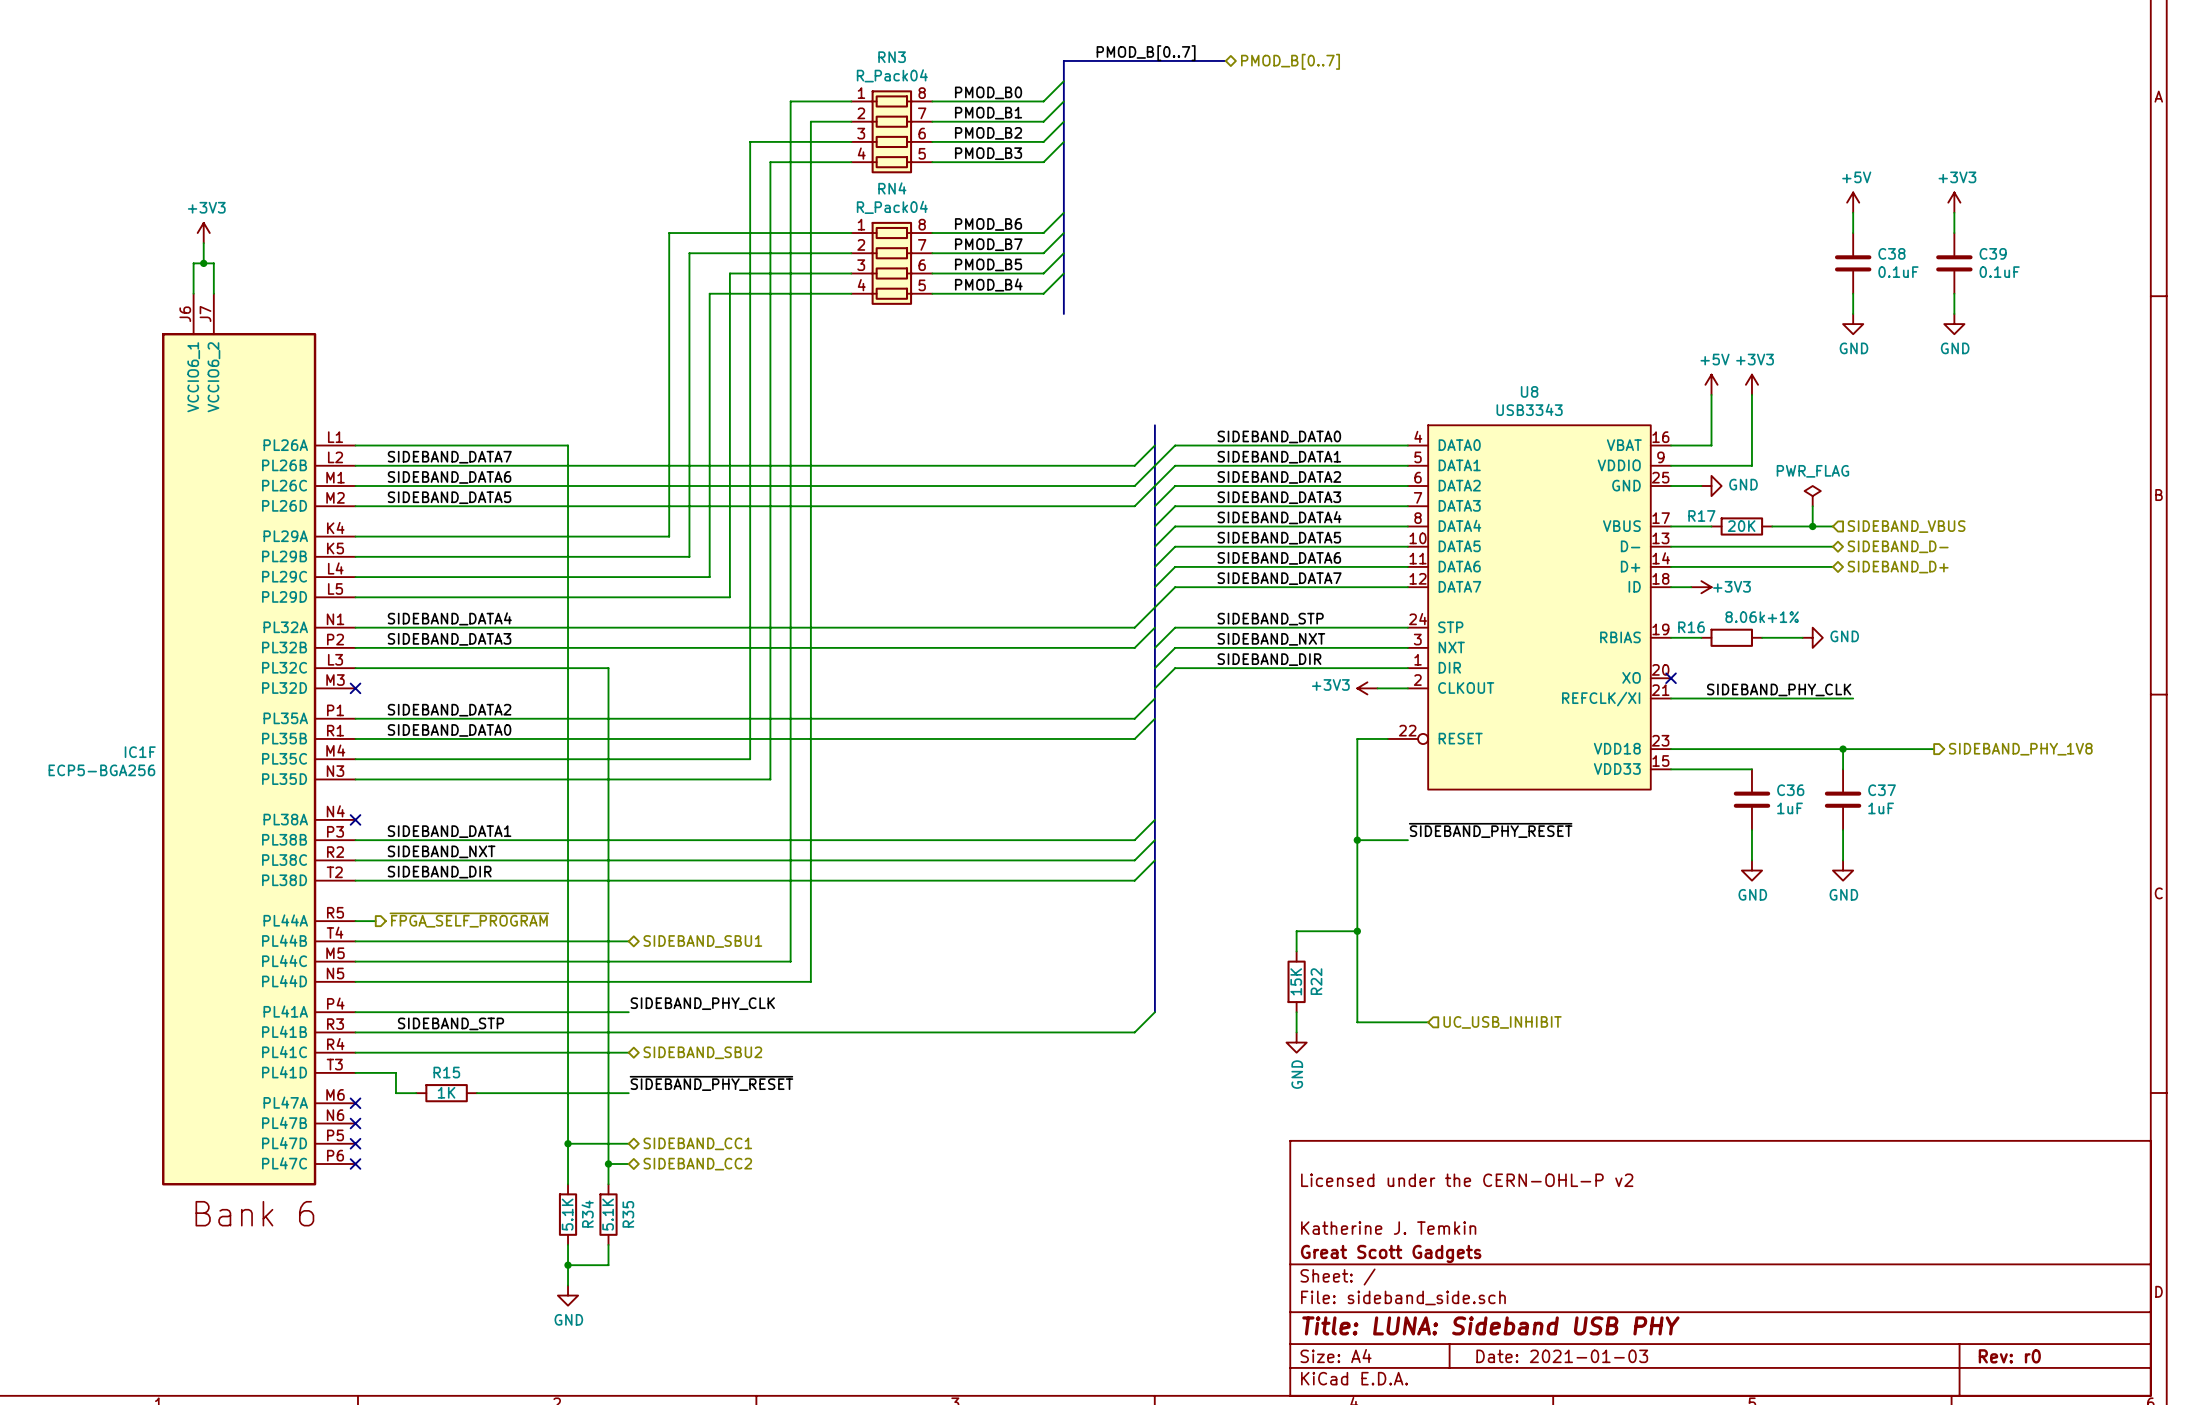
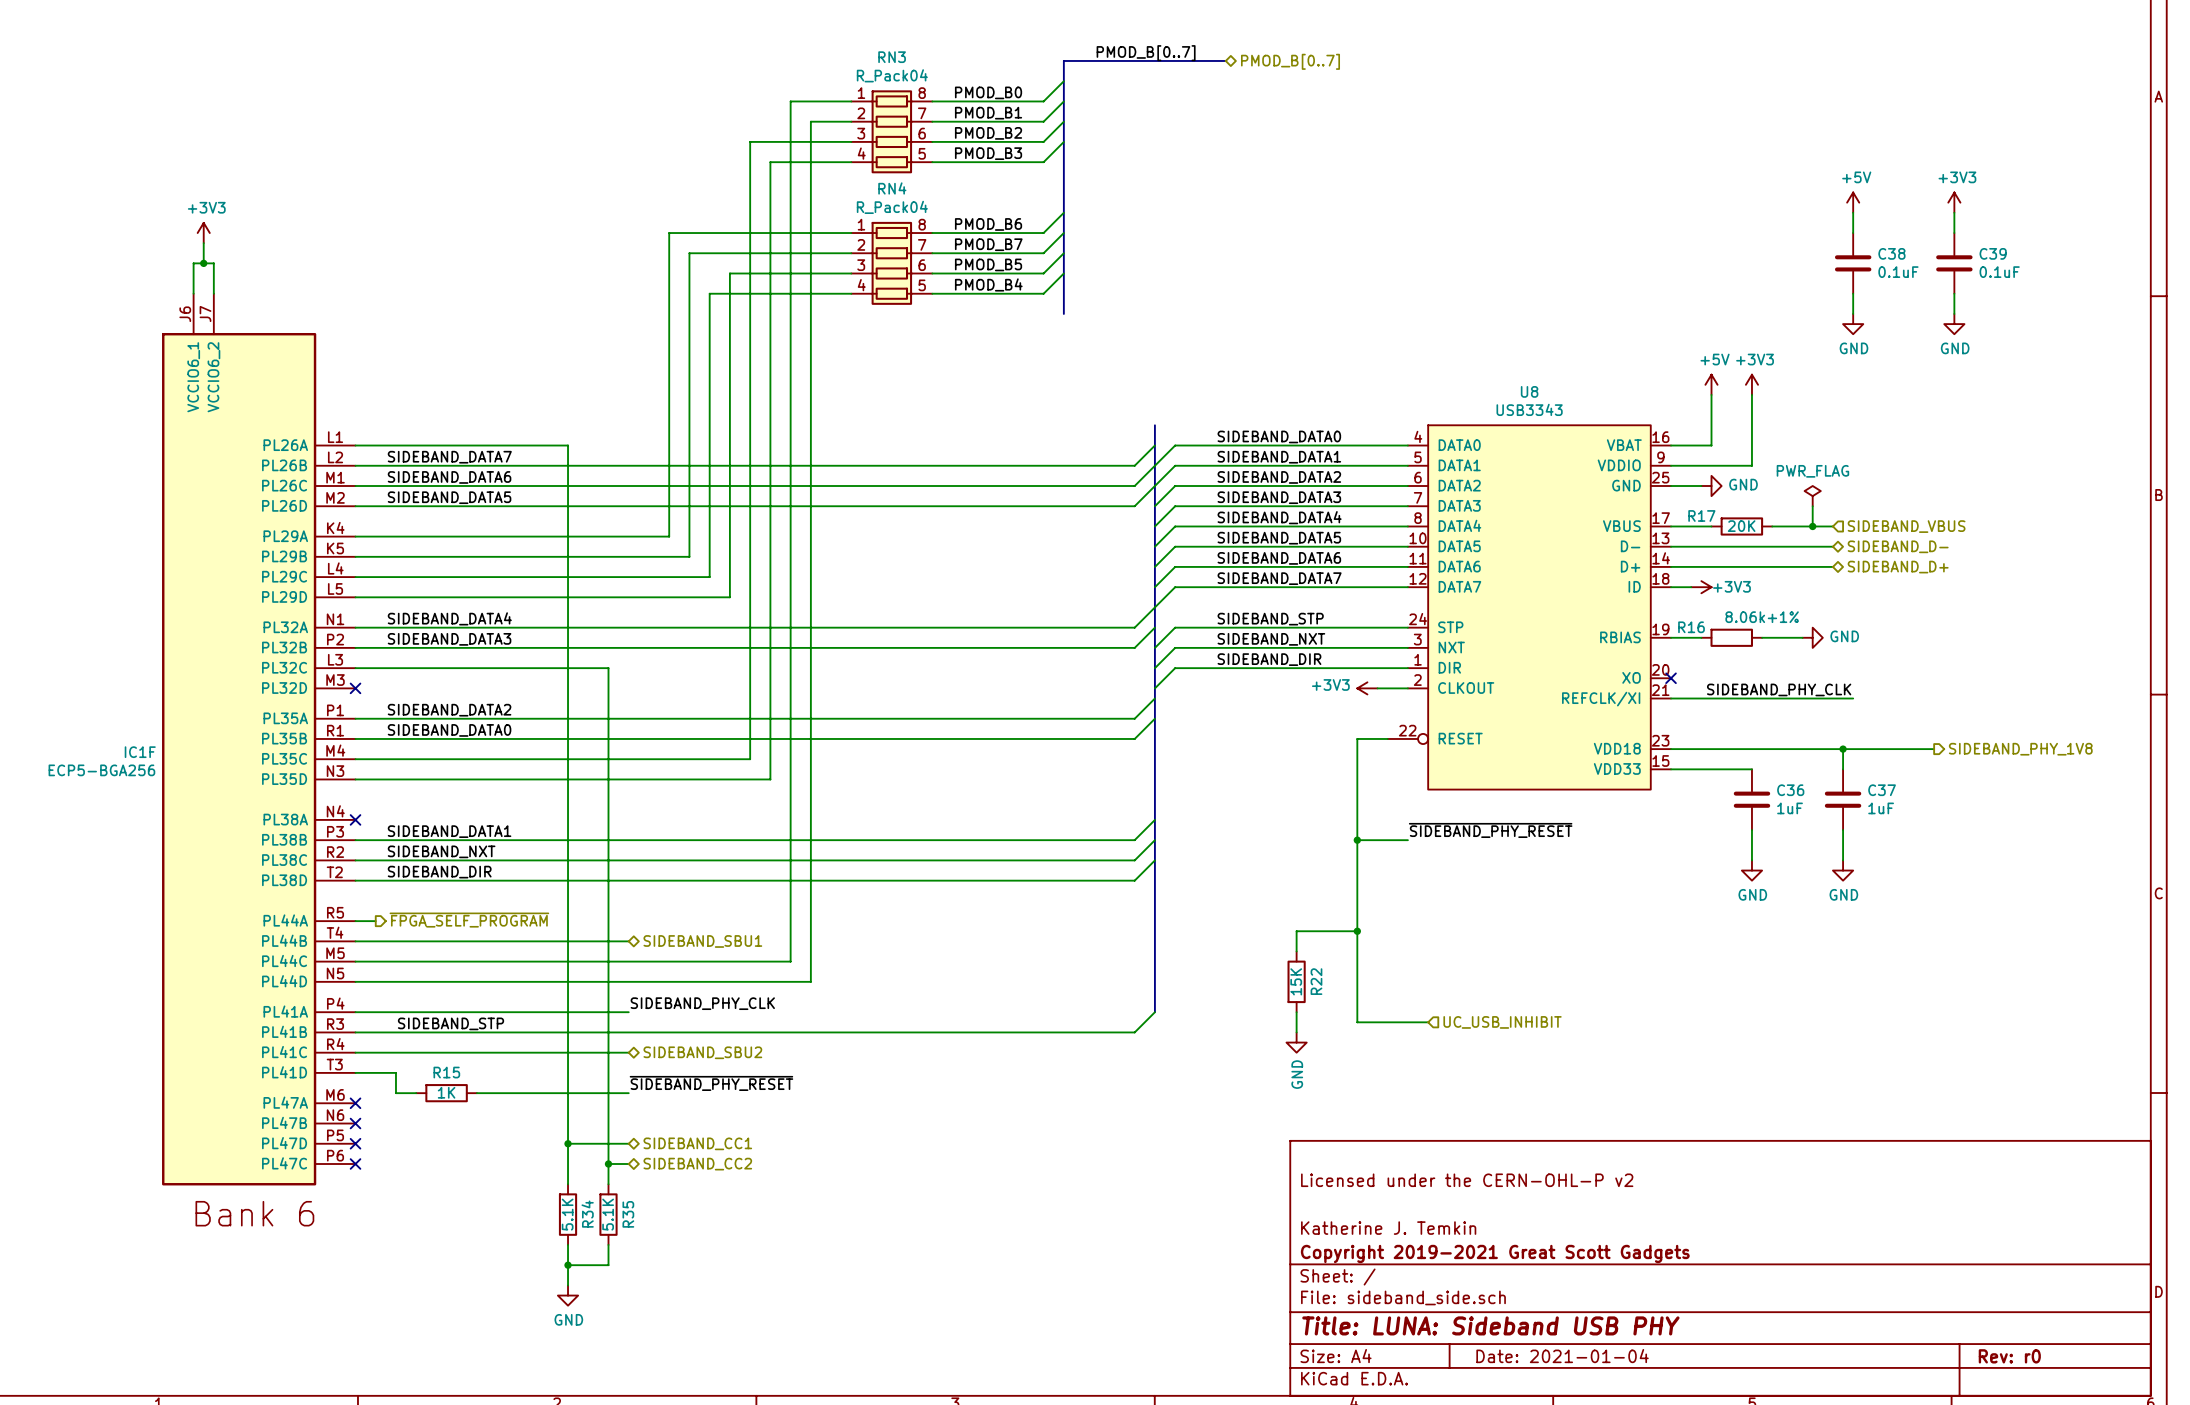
title block: Great Scott Gadgets (1391, 1253) -> Copyright 2019-2021 Great Scott Gadgets (1495, 1253)
title block: Date: 2021-01-03 (1562, 1356) -> Date: 2021-01-04 (1562, 1356)

